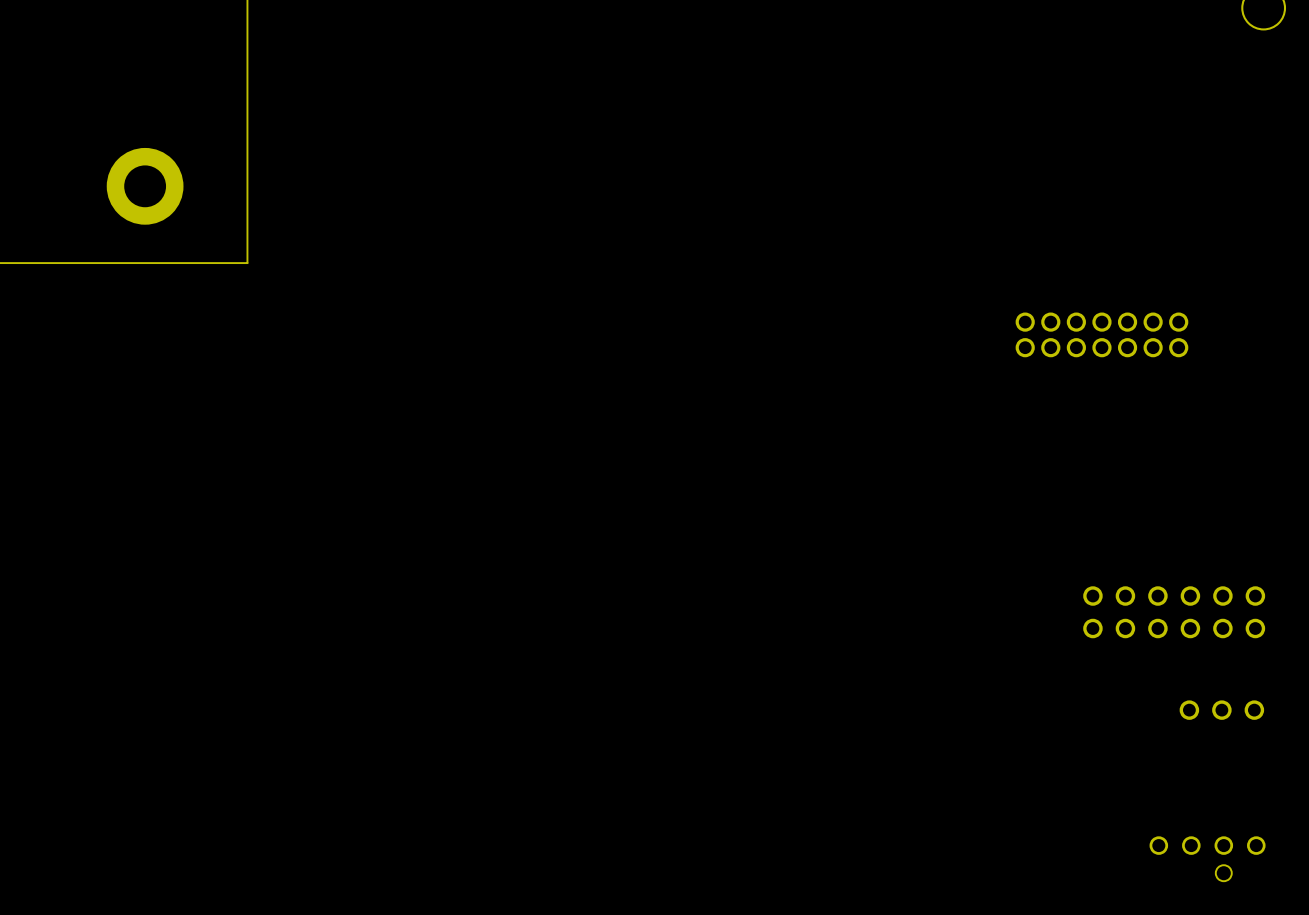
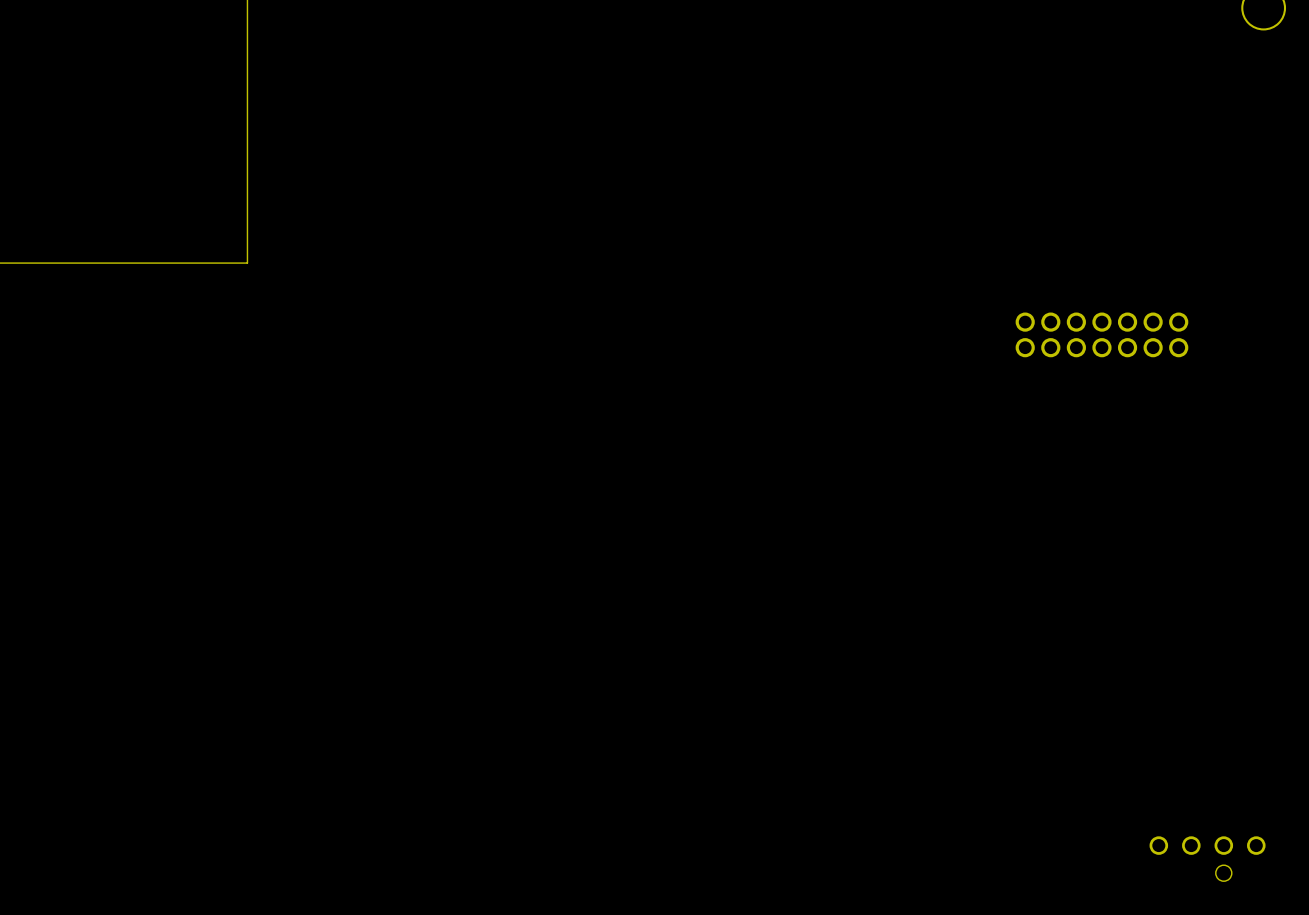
part: (145, 186) -> none
part: (1174, 612) -> none
part: (1221, 710) -> none

